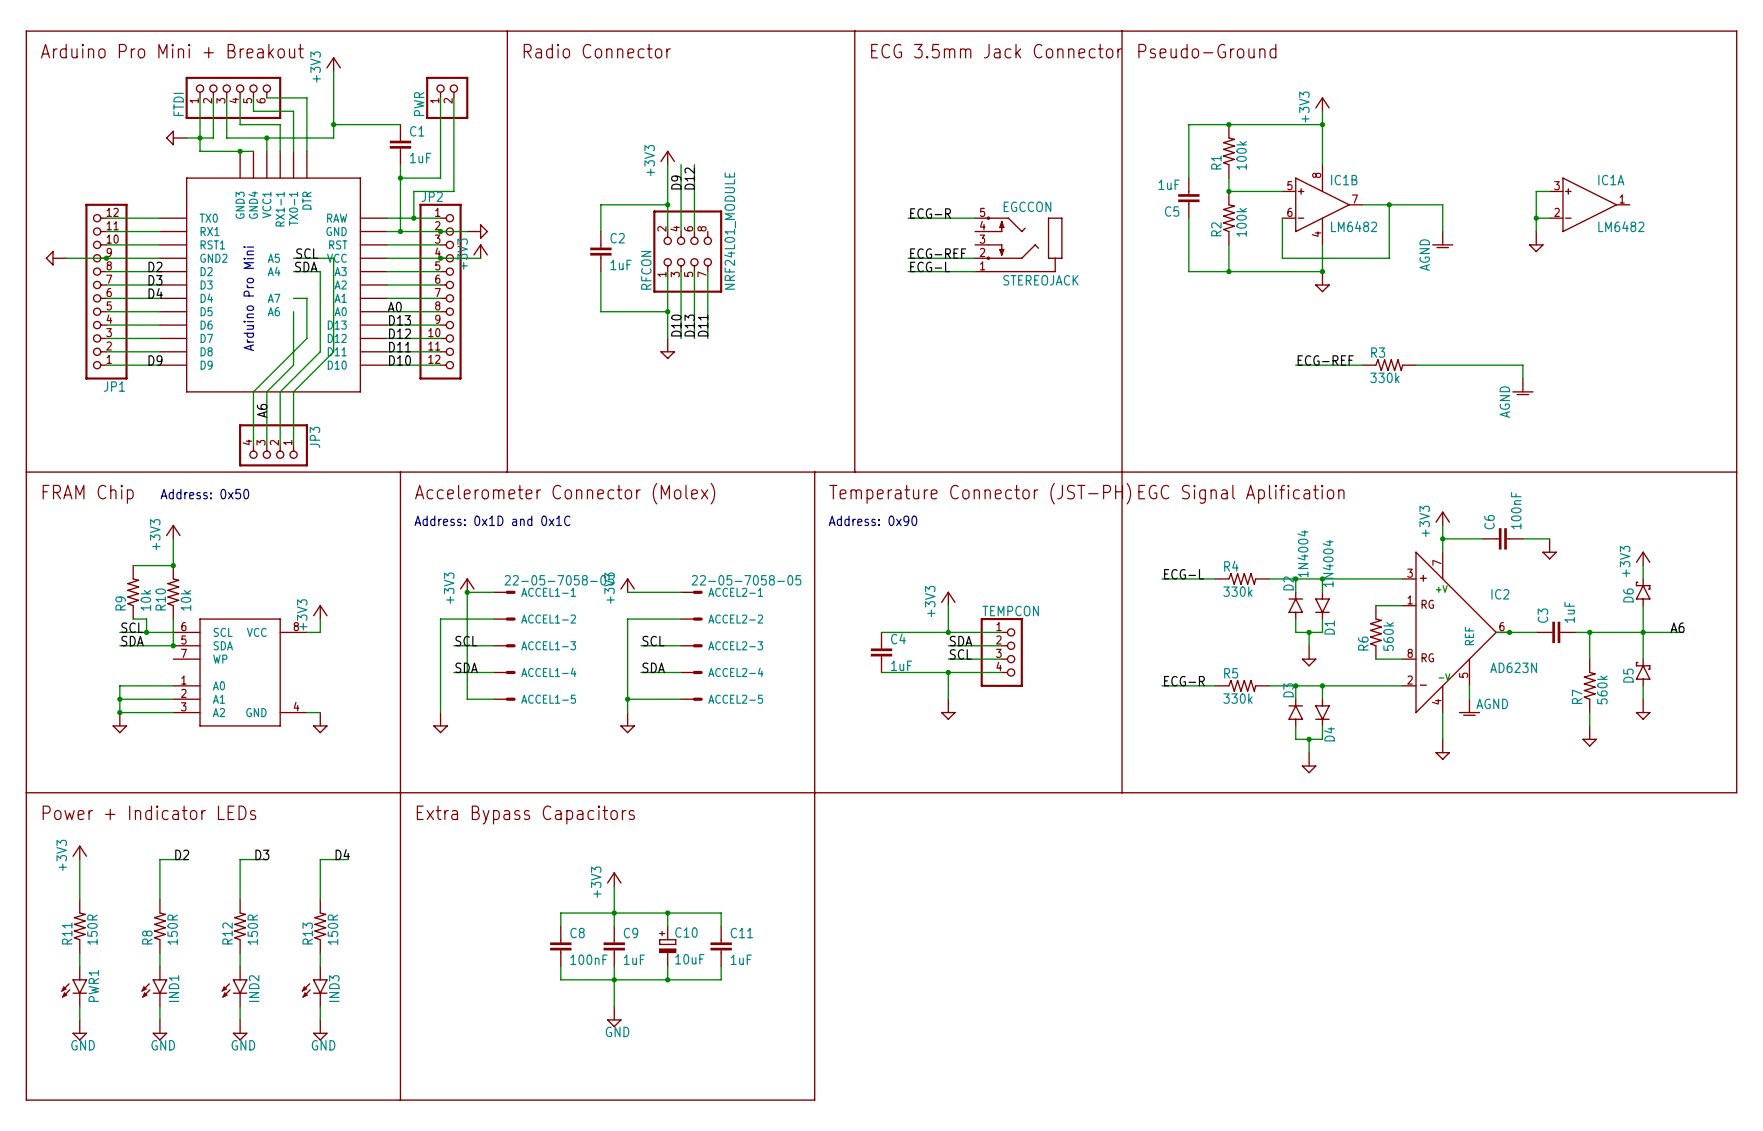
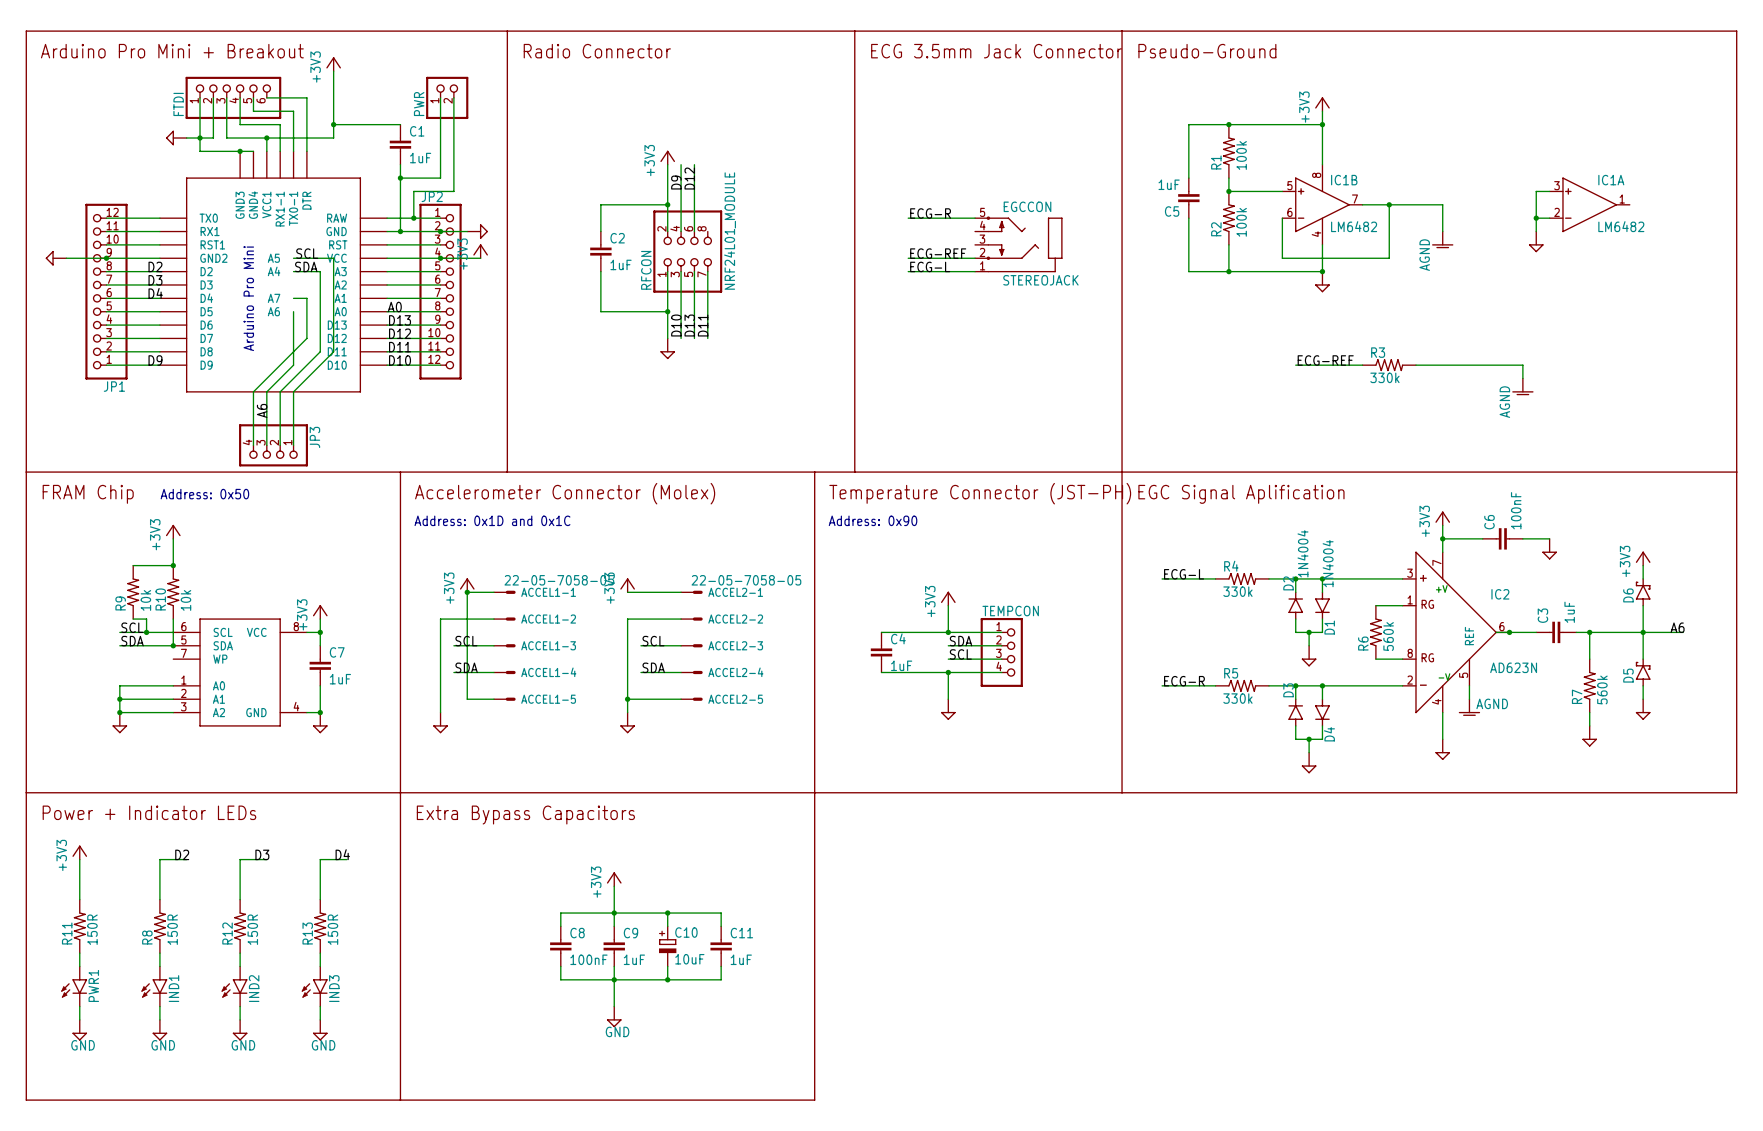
wire: none -> (320, 632) (320, 645)
junction: none -> (320, 632)
C7: none -> 1uF (320, 665)
wire: none -> (320, 685) (320, 712)
junction: none -> (320, 712)

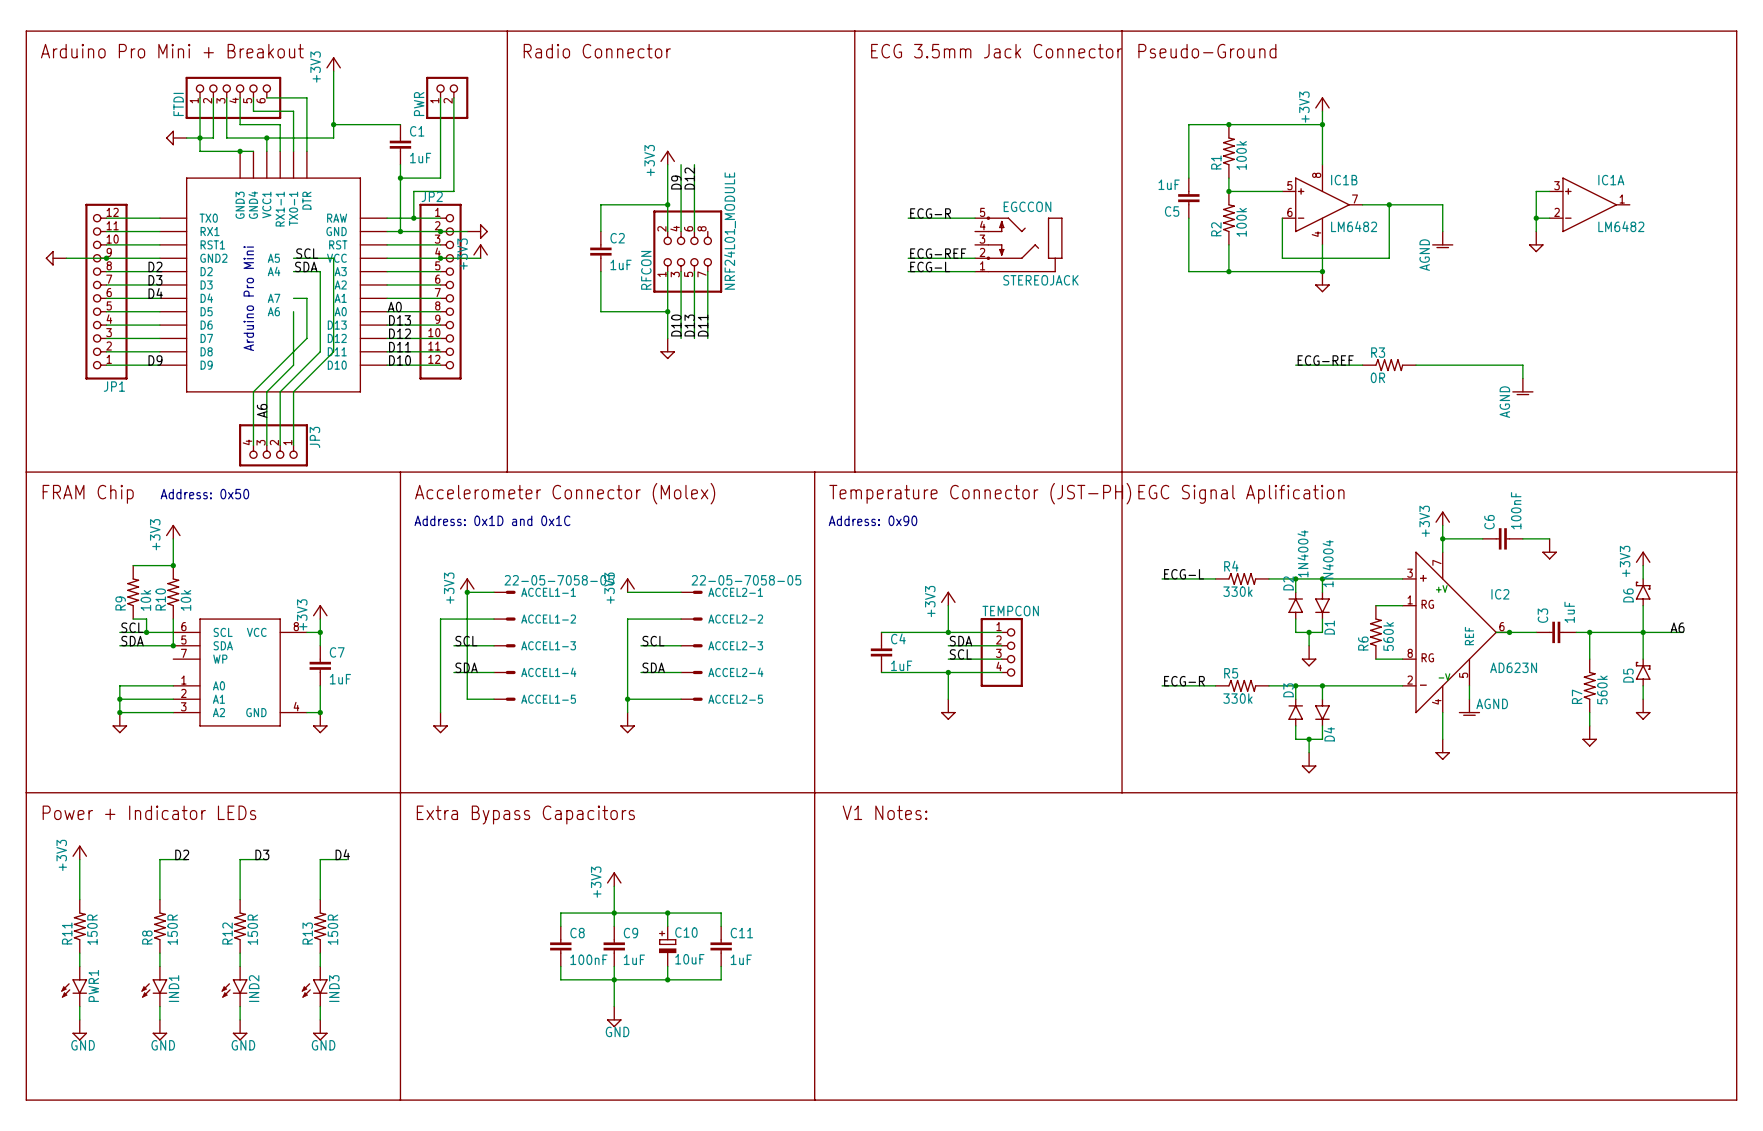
R3 value: 330k (1384, 377) -> 0R (1377, 377)
line: none -> (1736, 792) (1736, 1100) (814, 1100)
text: none -> V1 Notes: (885, 812)

